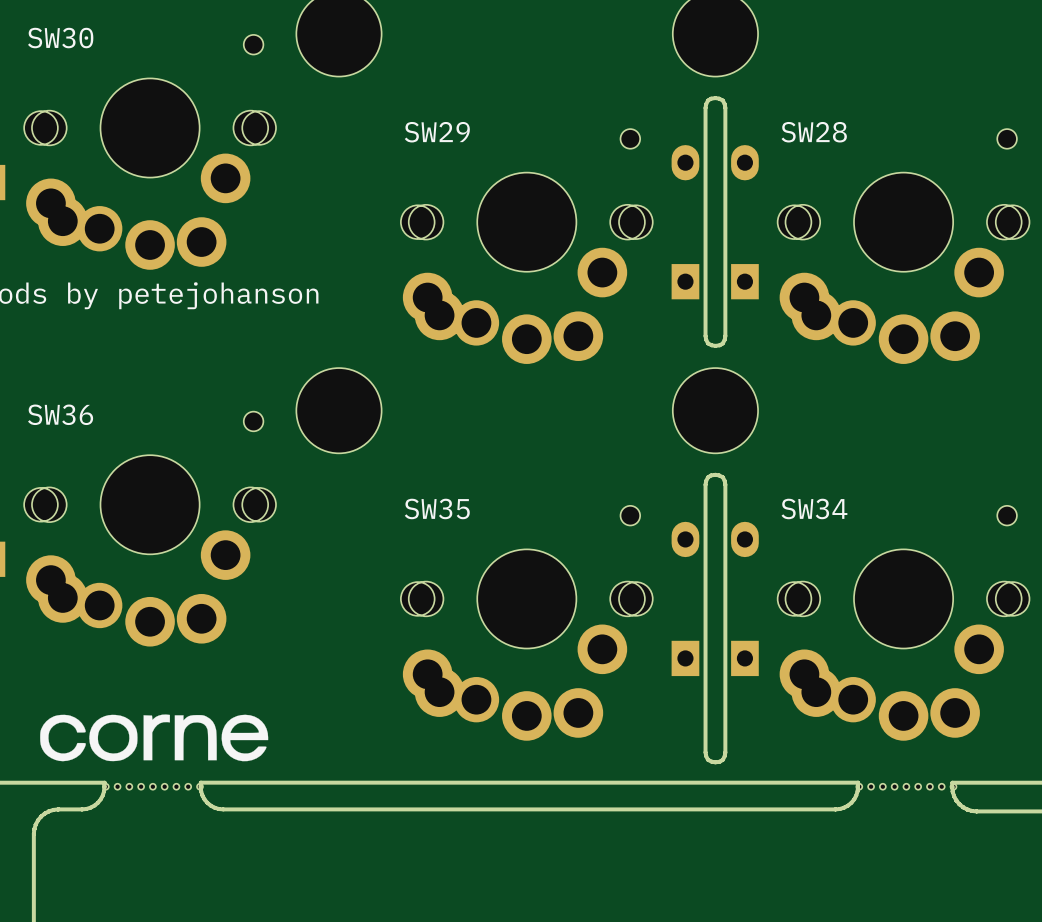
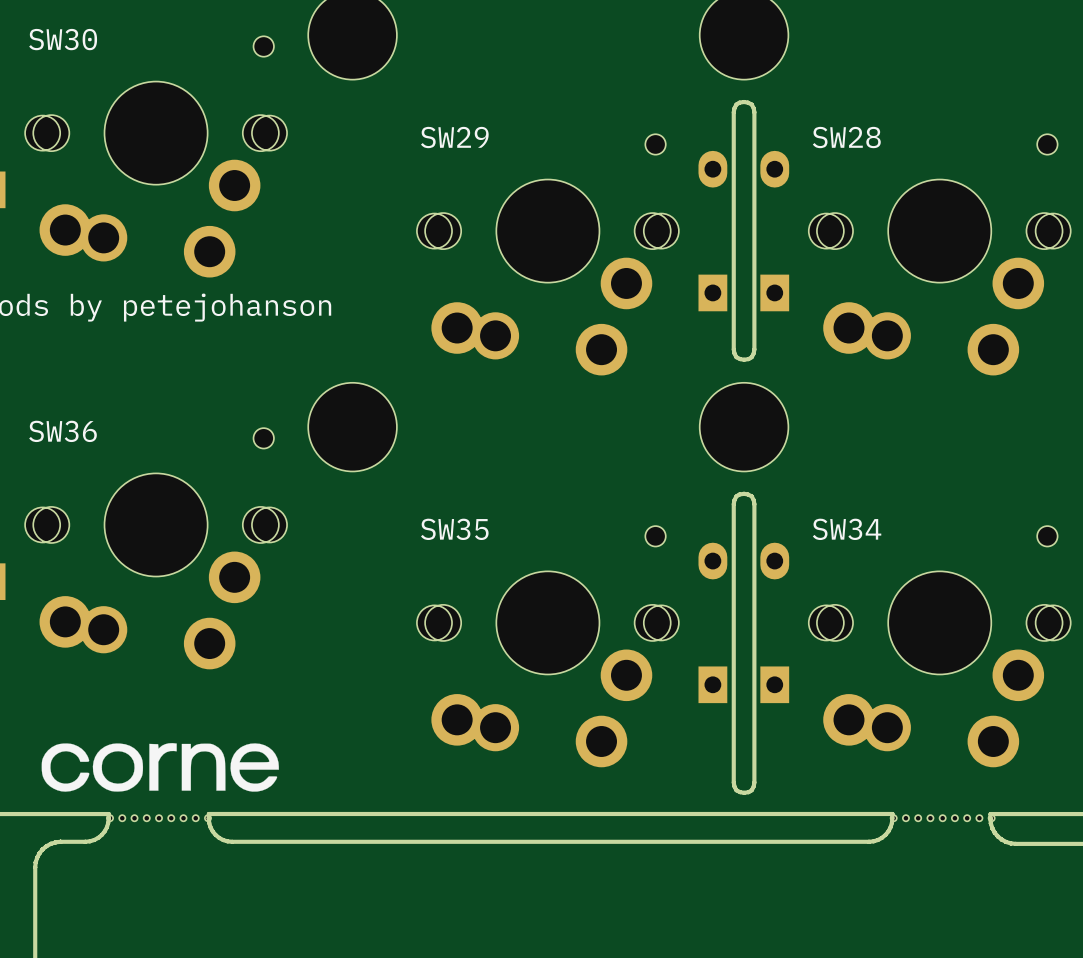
SW30 footprint: [24, 34, 276, 270] -> [25, 36, 288, 278]
SW29 footprint: [400, 129, 653, 364] -> [416, 134, 679, 376]
SW28 footprint: [777, 129, 1030, 364] -> [808, 134, 1071, 376]
SW36 footprint: [24, 411, 276, 647] -> [25, 428, 288, 670]
SW35 footprint: [400, 505, 653, 741] -> [416, 526, 679, 768]
SW34 footprint: [777, 505, 1030, 741] -> [808, 526, 1071, 768]

